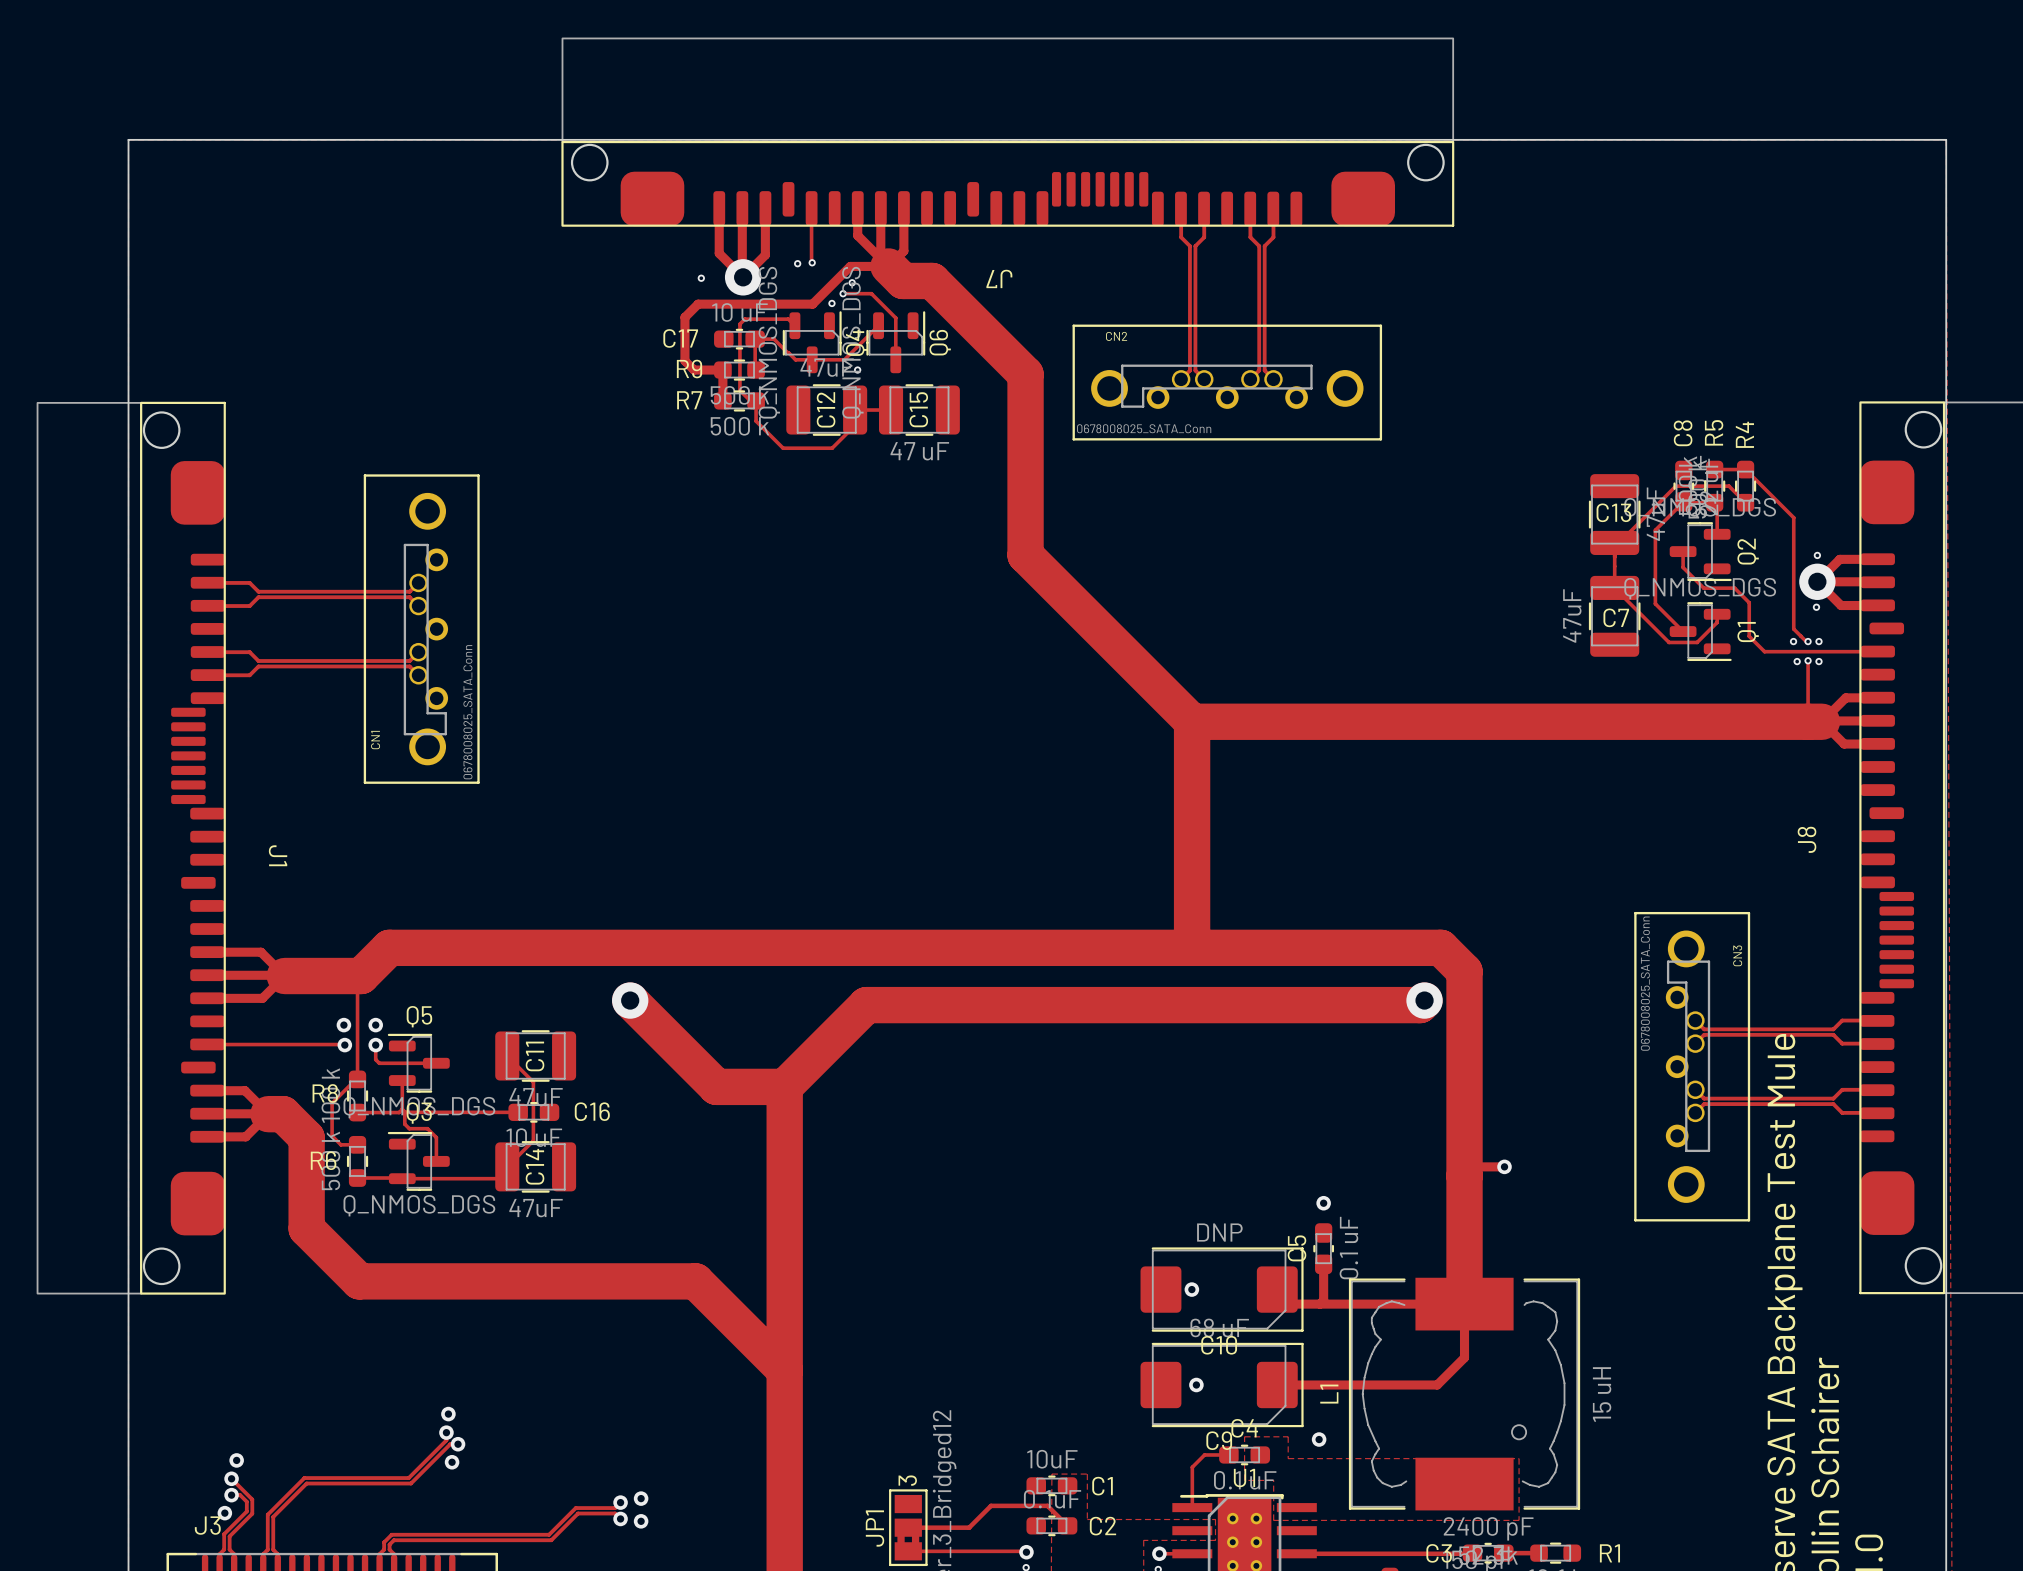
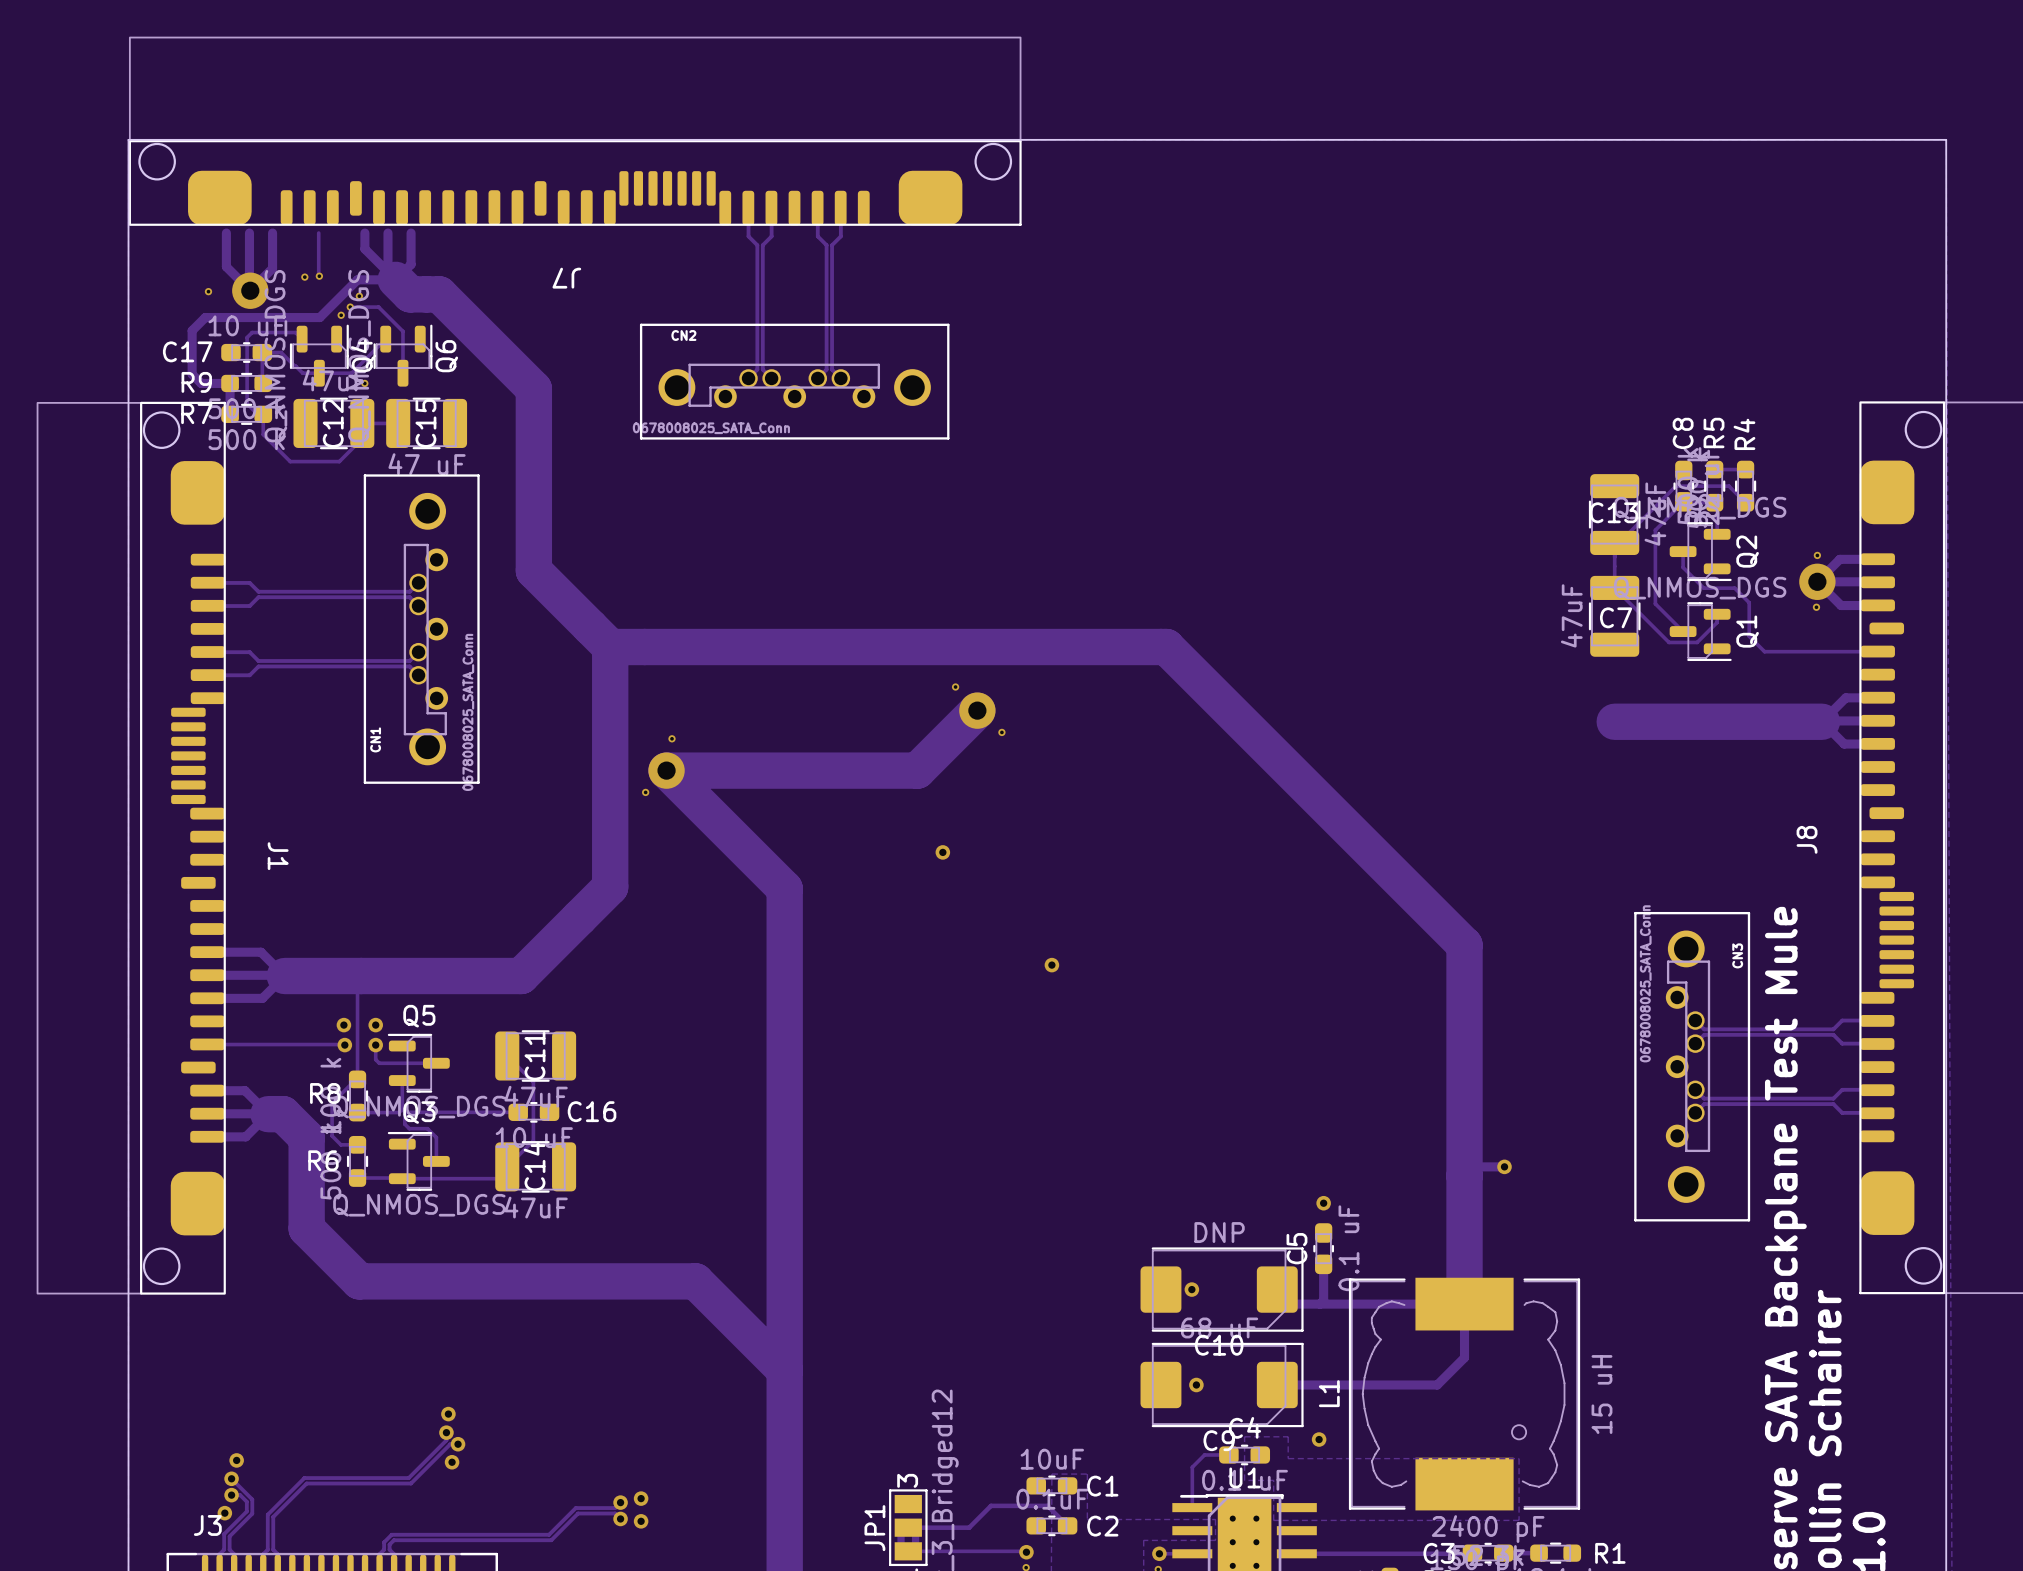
J7 position: (1007, 132) -> (575, 131)
track: (1181, 211) (1181, 237) (1189, 246) (1189, 370) (1181, 379) -> (748, 210) (748, 236) (757, 245) (757, 369) (748, 378)
track: (1204, 211) (1204, 237) (1195, 246) (1195, 370) (1204, 379) -> (771, 210) (771, 236) (762, 245) (762, 369) (771, 378)
track: (1250, 211) (1250, 237) (1259, 246) (1259, 370) (1250, 379) -> (817, 210) (817, 236) (826, 245) (826, 369) (817, 378)
track: (1273, 211) (1273, 237) (1264, 246) (1264, 370) (1273, 379) -> (840, 210) (840, 236) (832, 245) (832, 369) (840, 378)
track: (719, 219) (719, 253) (743, 277) (765, 255) (765, 219) -> none
track: (742, 219) (742, 276) -> none
track: (811, 219) (812, 262) -> none
track: (857, 219) (857, 235) (888, 266) -> none
track: (880, 219) (880, 258) -> none
track: (903, 219) (903, 251) (888, 266) -> none
track: none -> (226, 233) (226, 266) (250, 290) (272, 268) (272, 233)
track: none -> (249, 233) (249, 289)
track: none -> (318, 233) (319, 276)
track: none -> (364, 233) (364, 249) (395, 279)
track: none -> (387, 233) (387, 272)
track: none -> (411, 233) (411, 264) (395, 279)
via: (812, 262) -> none
via: (797, 263) -> none
track: (888, 266) (850, 266) (812, 304) (698, 304) (684, 317) (684, 360) (694, 370) (722, 370) (722, 400) -> none
track: (888, 266) (903, 280) (932, 280) (1025, 374) (1025, 555) (1192, 721) -> none
via: none -> (319, 276)
via: none -> (304, 277)
via: (743, 277) -> none
via: (701, 278) -> none
track: none -> (395, 279) (357, 279) (319, 317) (205, 317) (192, 330) (192, 374) (201, 383) (230, 383) (230, 414)
track: none -> (395, 279) (410, 294) (439, 294) (533, 388) (533, 570) (610, 647)
via: (852, 282) -> none
via: none -> (250, 290)
via: none -> (208, 291)
track: (843, 293) (871, 293) (895, 318) (895, 359) -> none
via: (843, 293) -> none
via: none -> (359, 296)
via: (831, 303) -> none
track: none -> (350, 307) (378, 307) (402, 331) (402, 373)
via: none -> (350, 307)
via: none -> (341, 315)
track: (794, 325) (788, 319) (744, 319) (739, 324) (739, 390) (750, 400) (756, 400) (756, 421) (783, 448) (832, 448) (855, 425) (855, 410) (891, 410) -> none
track: (878, 325) (844, 359) (795, 359) (774, 339) (755, 339) (756, 370) -> none
track: none -> (302, 339) (295, 332) (252, 332) (247, 337) (247, 403) (257, 414) (263, 414) (263, 434) (290, 461) (339, 461) (362, 438) (362, 423) (398, 423)
track: none -> (385, 339) (351, 373) (302, 373) (281, 352) (262, 352) (263, 383)
C17 position: (739, 339) -> (246, 352)
Q4 position: (812, 342) -> (319, 355)
Q6 position: (895, 342) -> (402, 355)
R9 position: (739, 370) -> (246, 383)
via: (857, 370) -> none
CN2 position: (1227, 382) -> (794, 381)
via: none -> (364, 383)
R7 position: (739, 400) -> (246, 414)
C12 position: (826, 410) -> (333, 423)
C15 position: (919, 410) -> (426, 423)
track: (1745, 469) (1793, 517) (1793, 629) (1808, 641) -> none
via: (1793, 641) -> none
via: (1808, 641) -> none
via: (1818, 641) -> none
track: none -> (610, 647) (610, 886) (521, 976) (361, 976)
track: (1808, 660) (1808, 721) -> none
via: (1808, 660) -> none
via: (1797, 661) -> none
via: (1818, 661) -> none
via: none -> (955, 687)
track: none -> (977, 710) (917, 770) (666, 770) (784, 888) (784, 1086)
via: none -> (977, 710)
track: (1192, 721) (1614, 721) -> none
track: (1192, 721) (1192, 946) (1193, 947) -> none
via: none -> (1001, 732)
via: none -> (672, 738)
via: none -> (666, 770)
via: none -> (645, 792)
via: none -> (942, 852)
via: none -> (1051, 965)
track: (1464, 971) (1440, 947) (389, 947) (361, 976) -> (1464, 971) (1464, 945) (1166, 647) (610, 647)
track: (630, 1000) (716, 1086) (784, 1086) (866, 1005) (1420, 1005) (1424, 1000) -> none
via: (630, 1000) -> none
via: (1424, 1000) -> none

